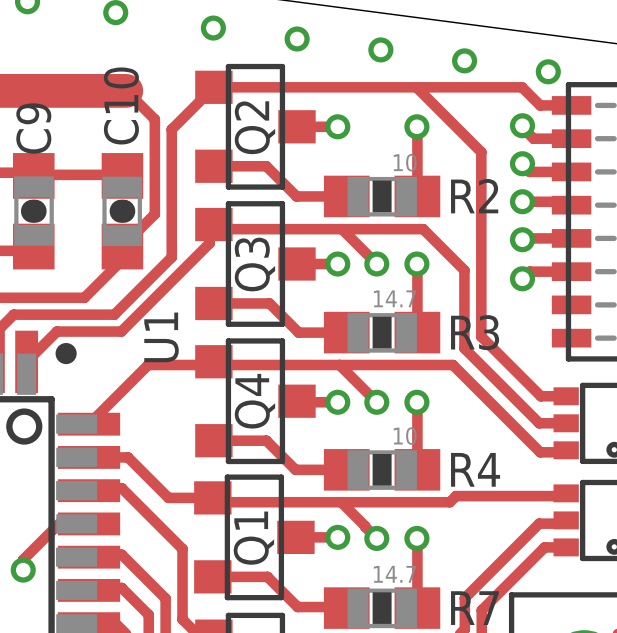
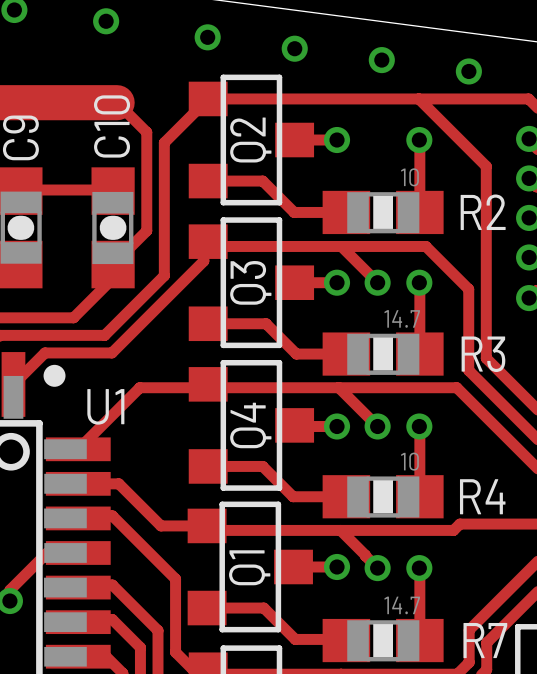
U1 name rotation: 0° (161, 337) -> 90° clockwise (105, 406)

